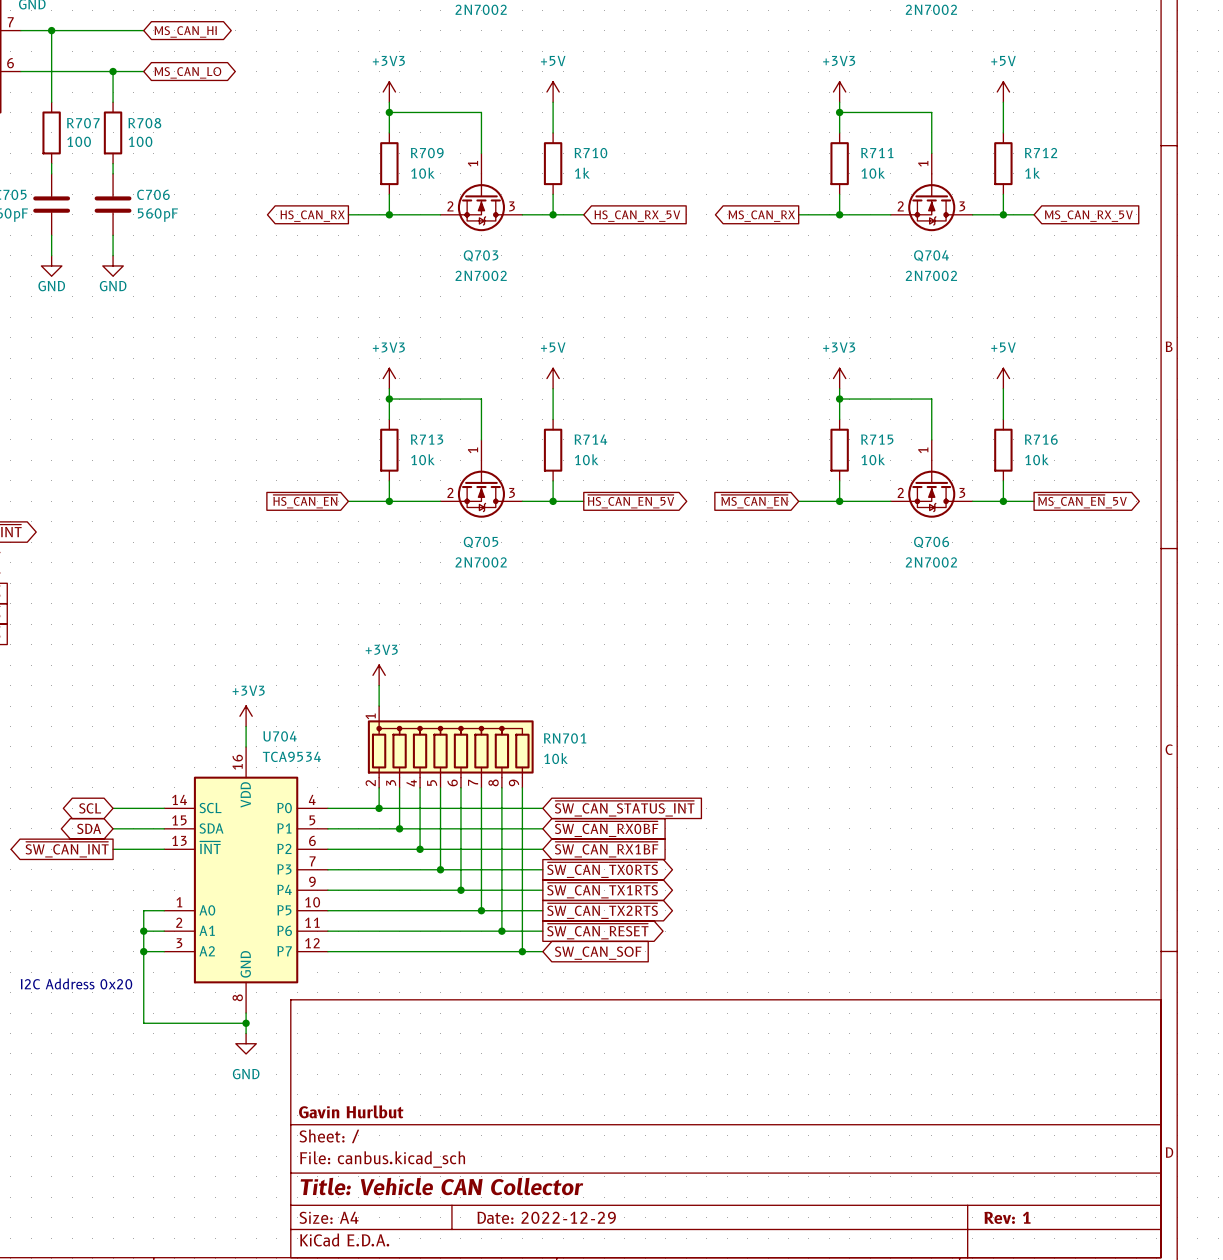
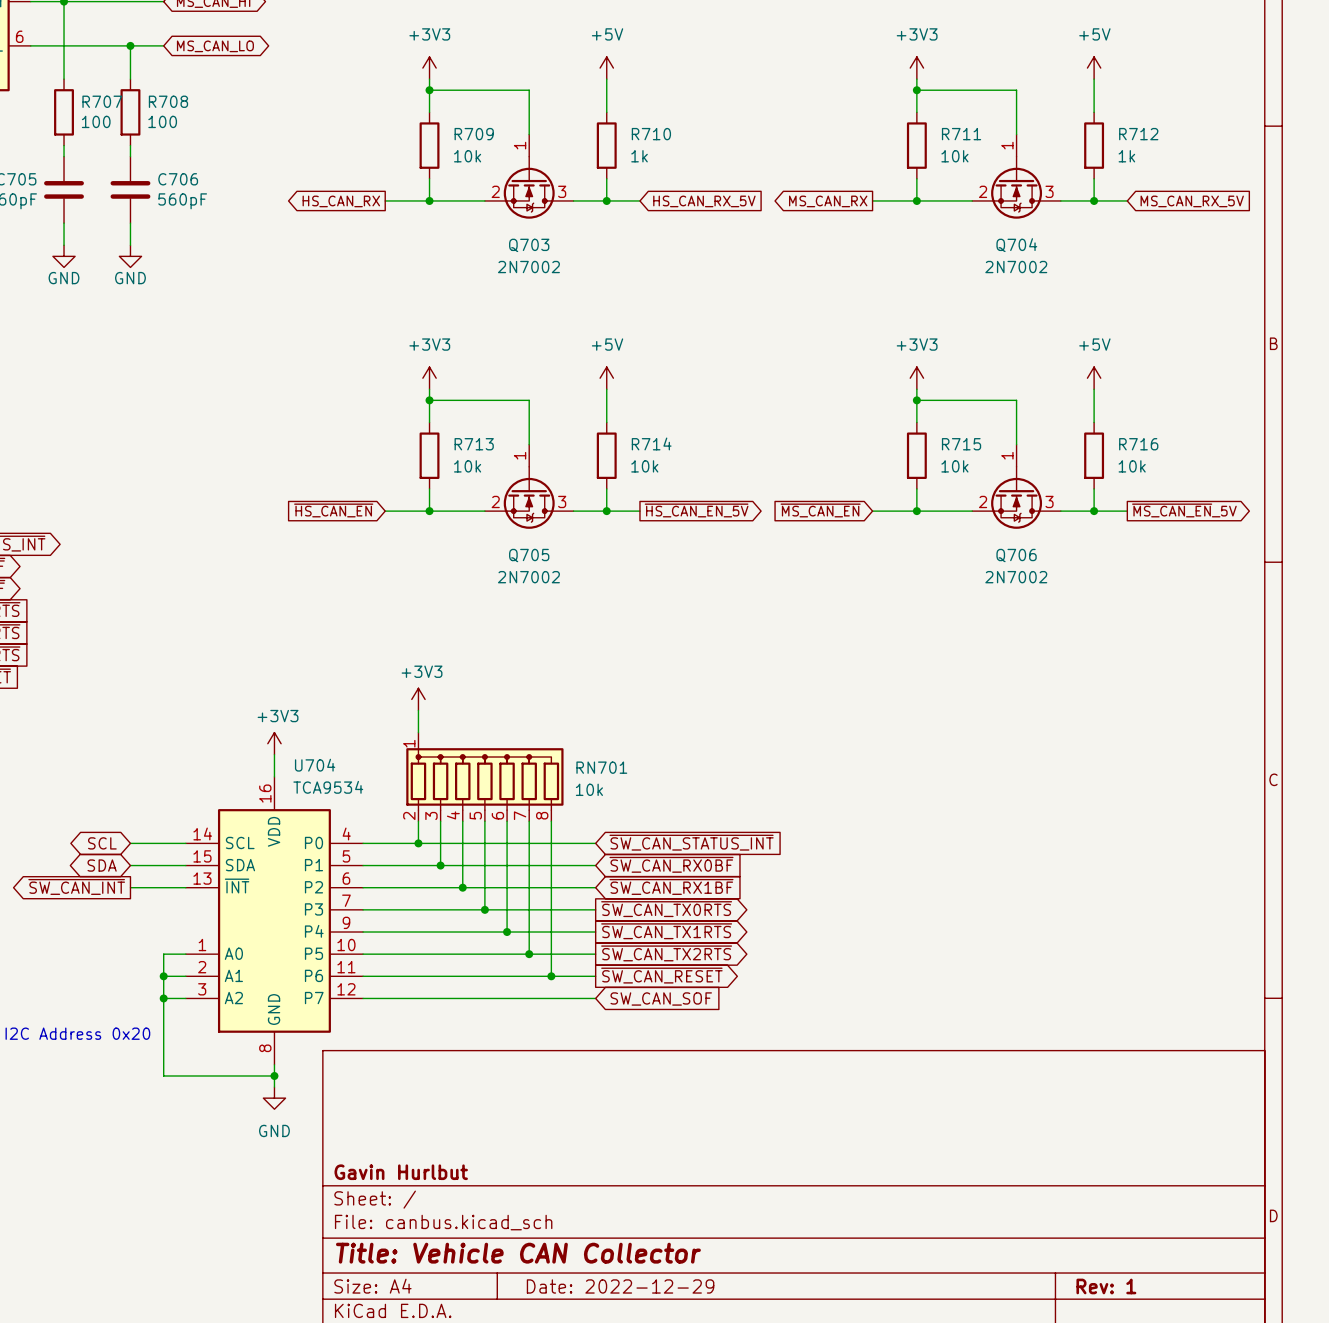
RN701 symbol: [367, 706, 534, 788] -> [406, 732, 564, 822]
wire: (522, 787) (522, 951) -> none
junction: (522, 951) -> none

